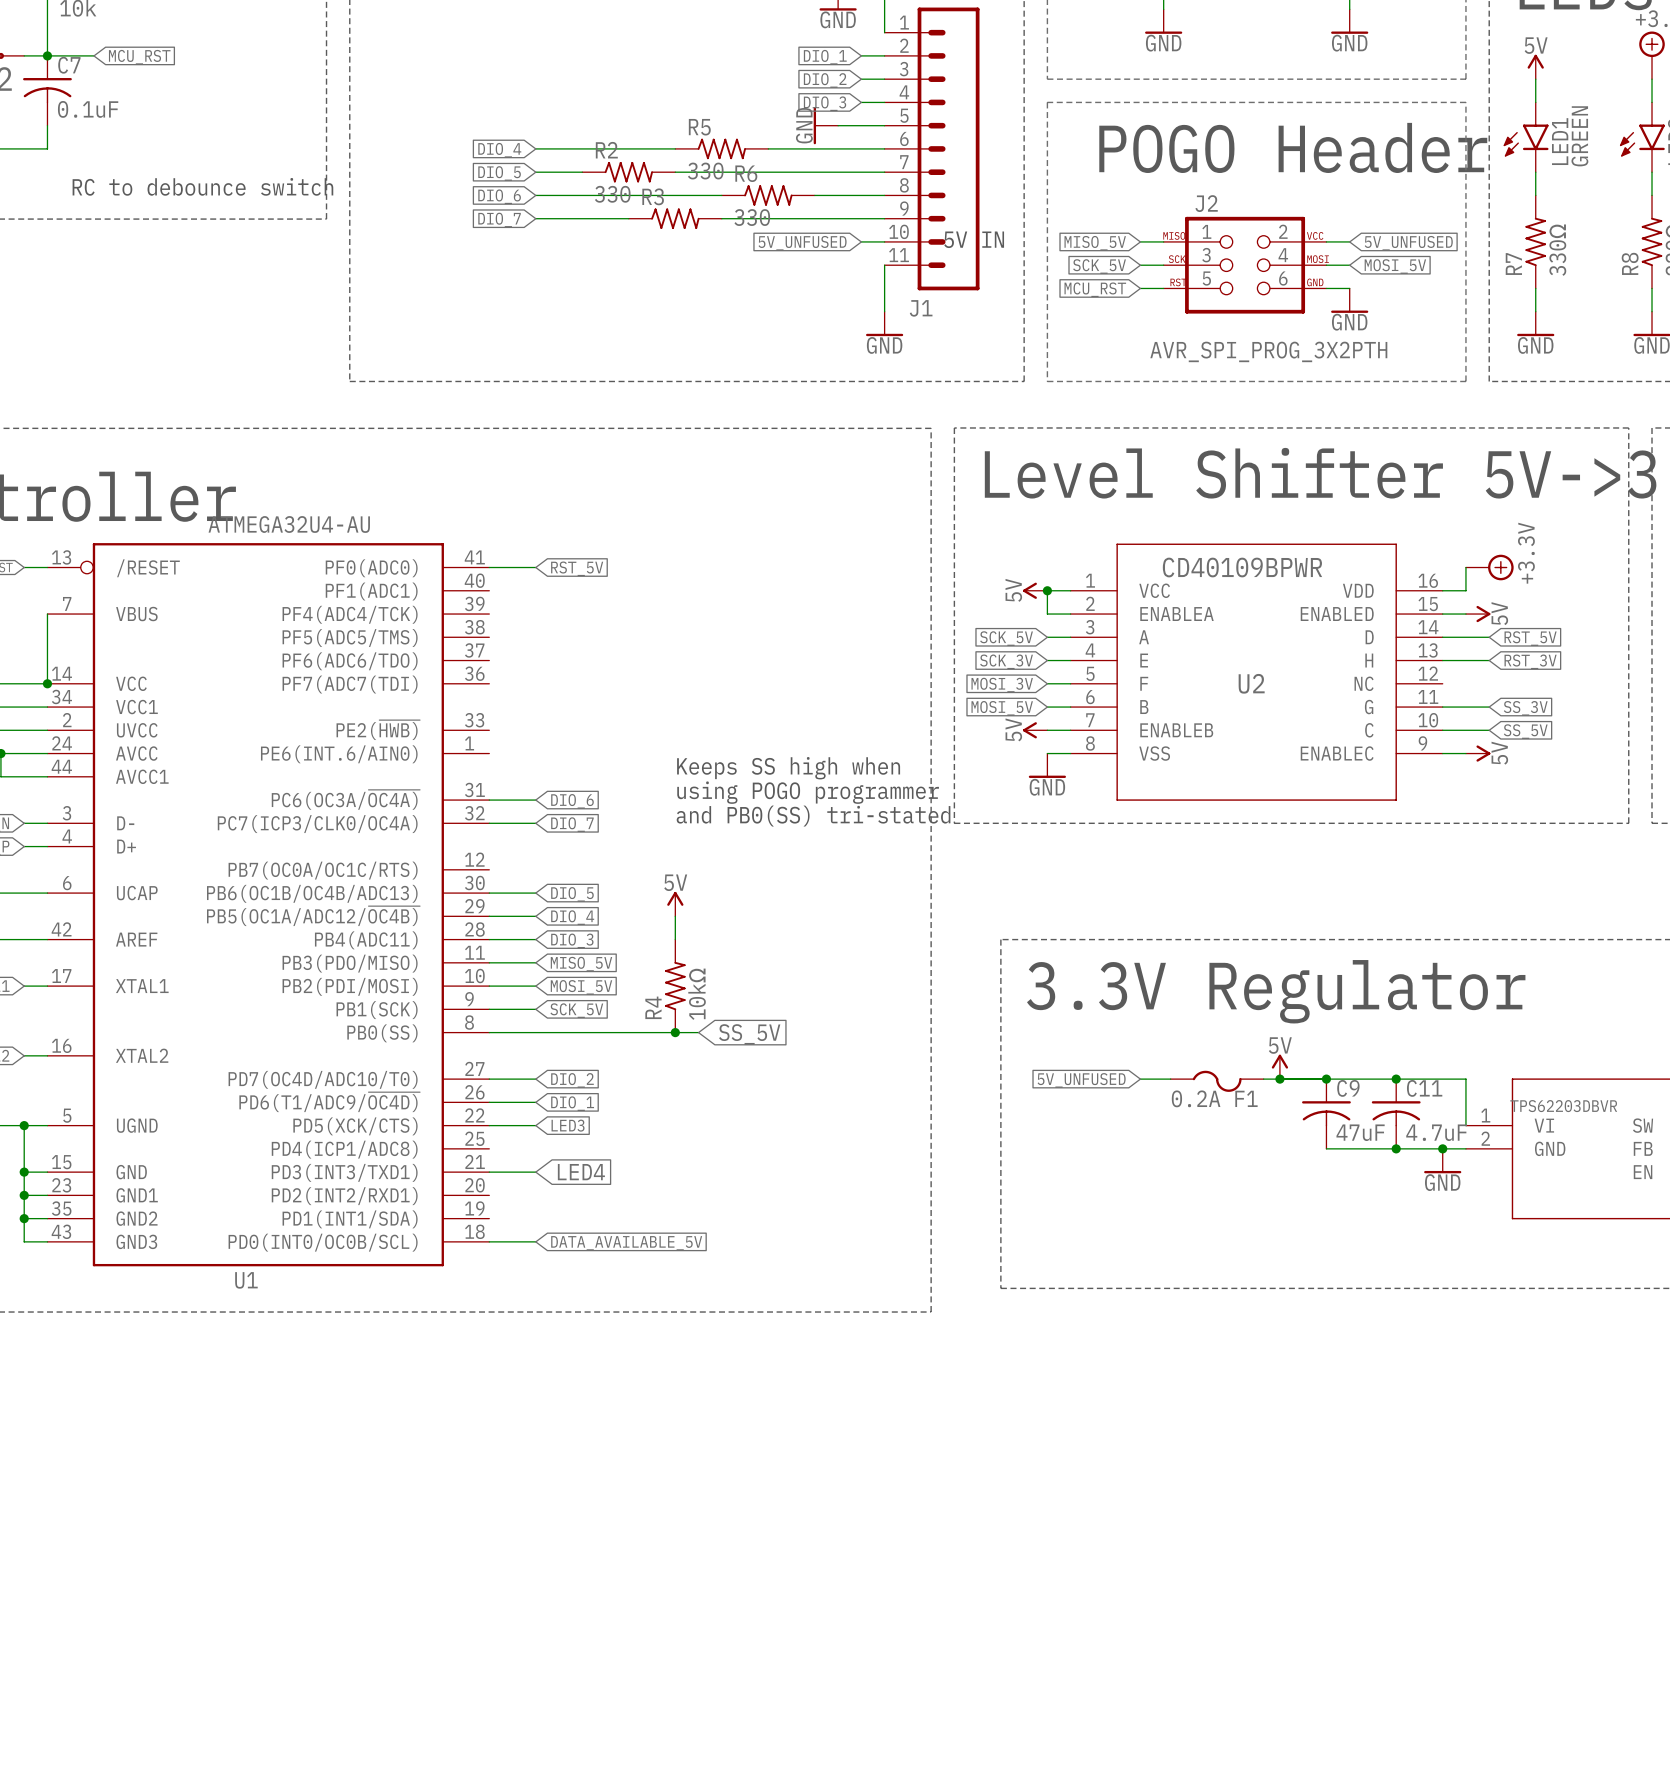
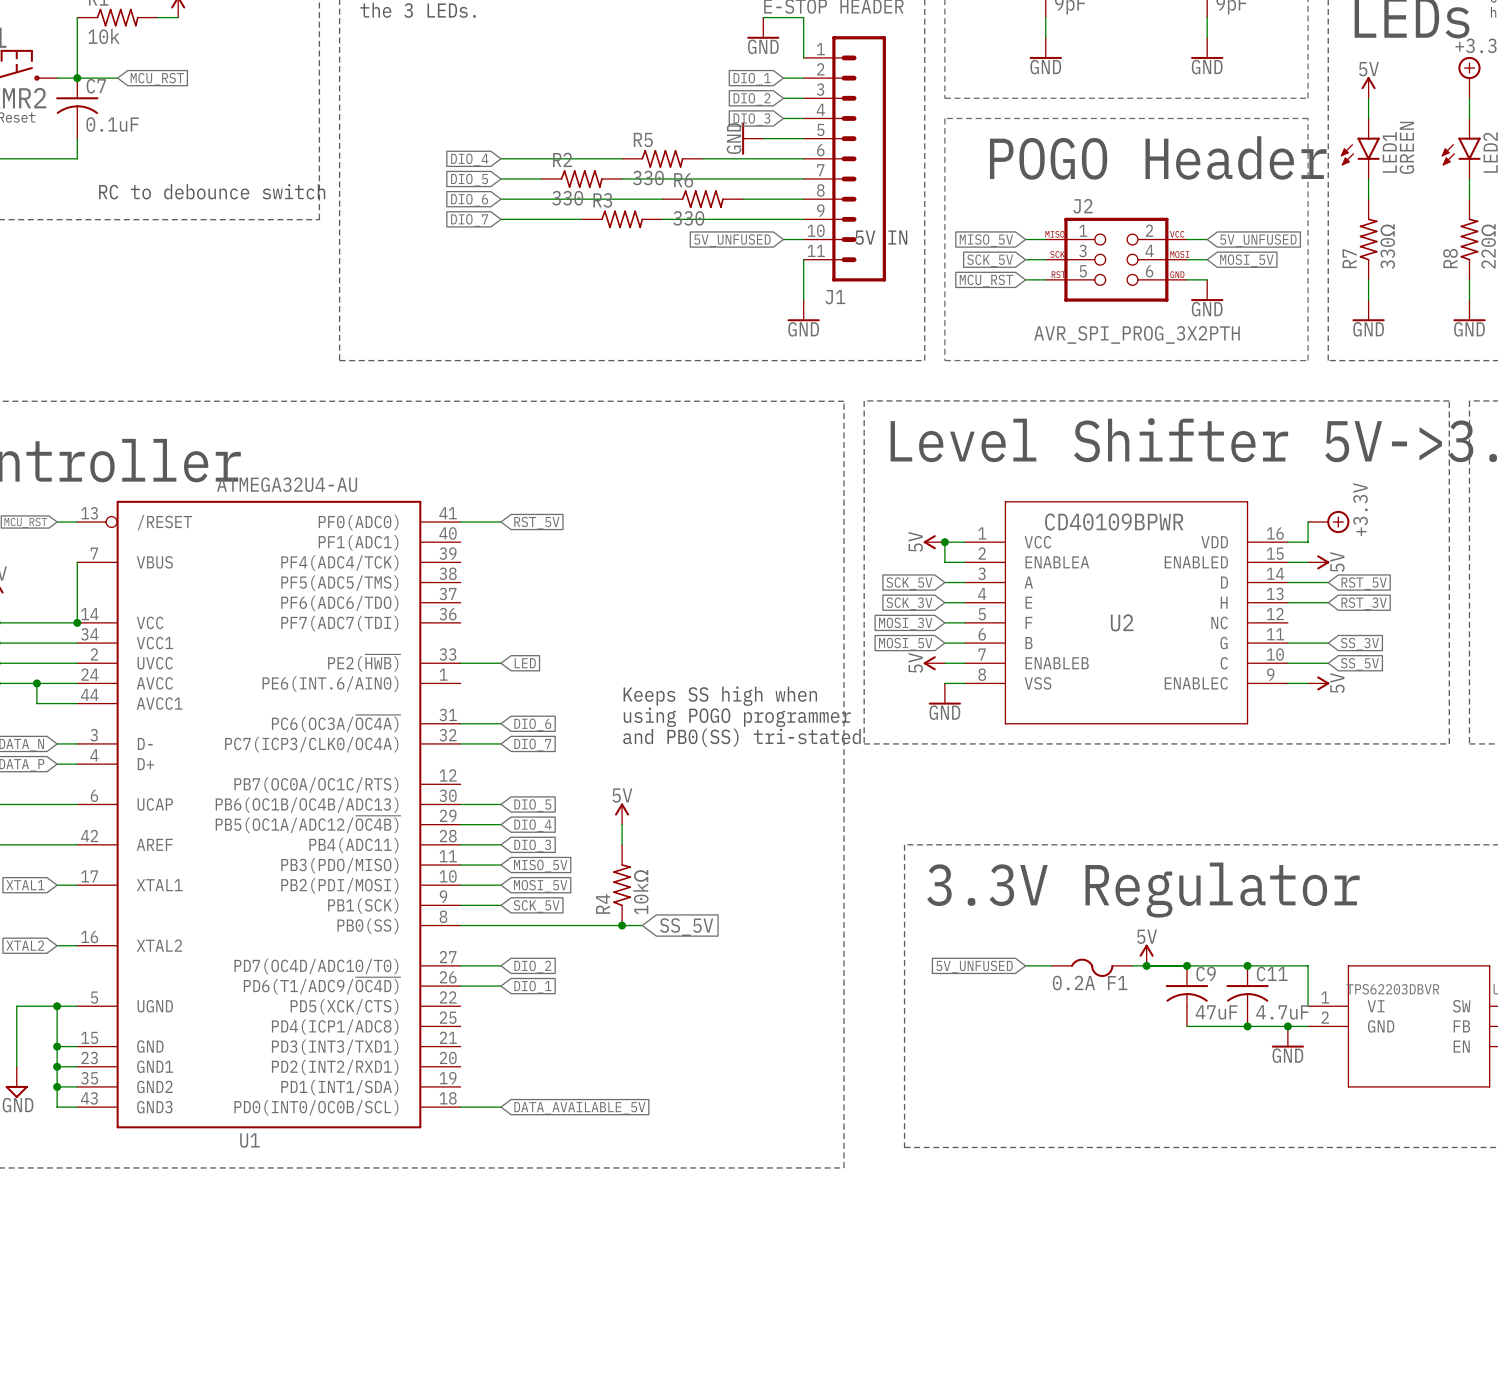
wire: none -> (460, 663) (501, 663)
global label: none -> LED (525, 663)
wire: (489, 1125) (535, 1125) -> none
global label: LED3 (568, 1125) -> none
wire: (489, 1172) (535, 1172) -> none
global label: LED4 (581, 1172) -> none

